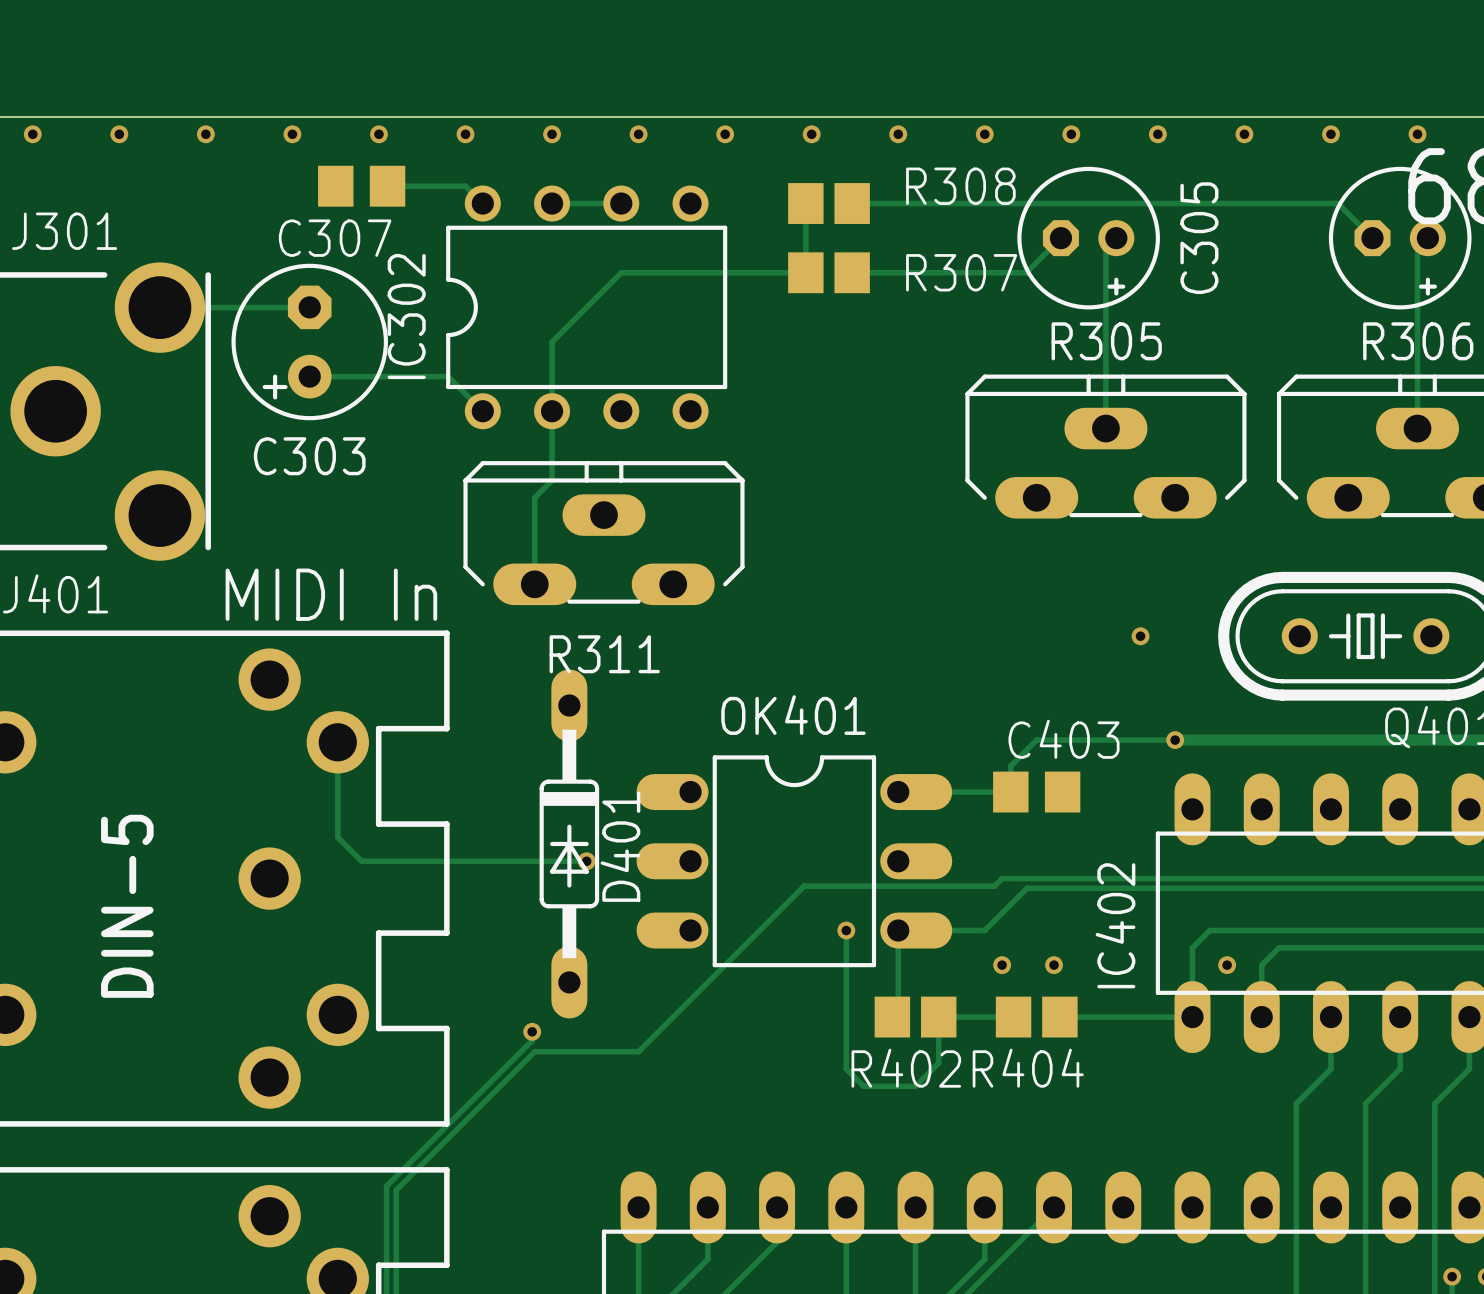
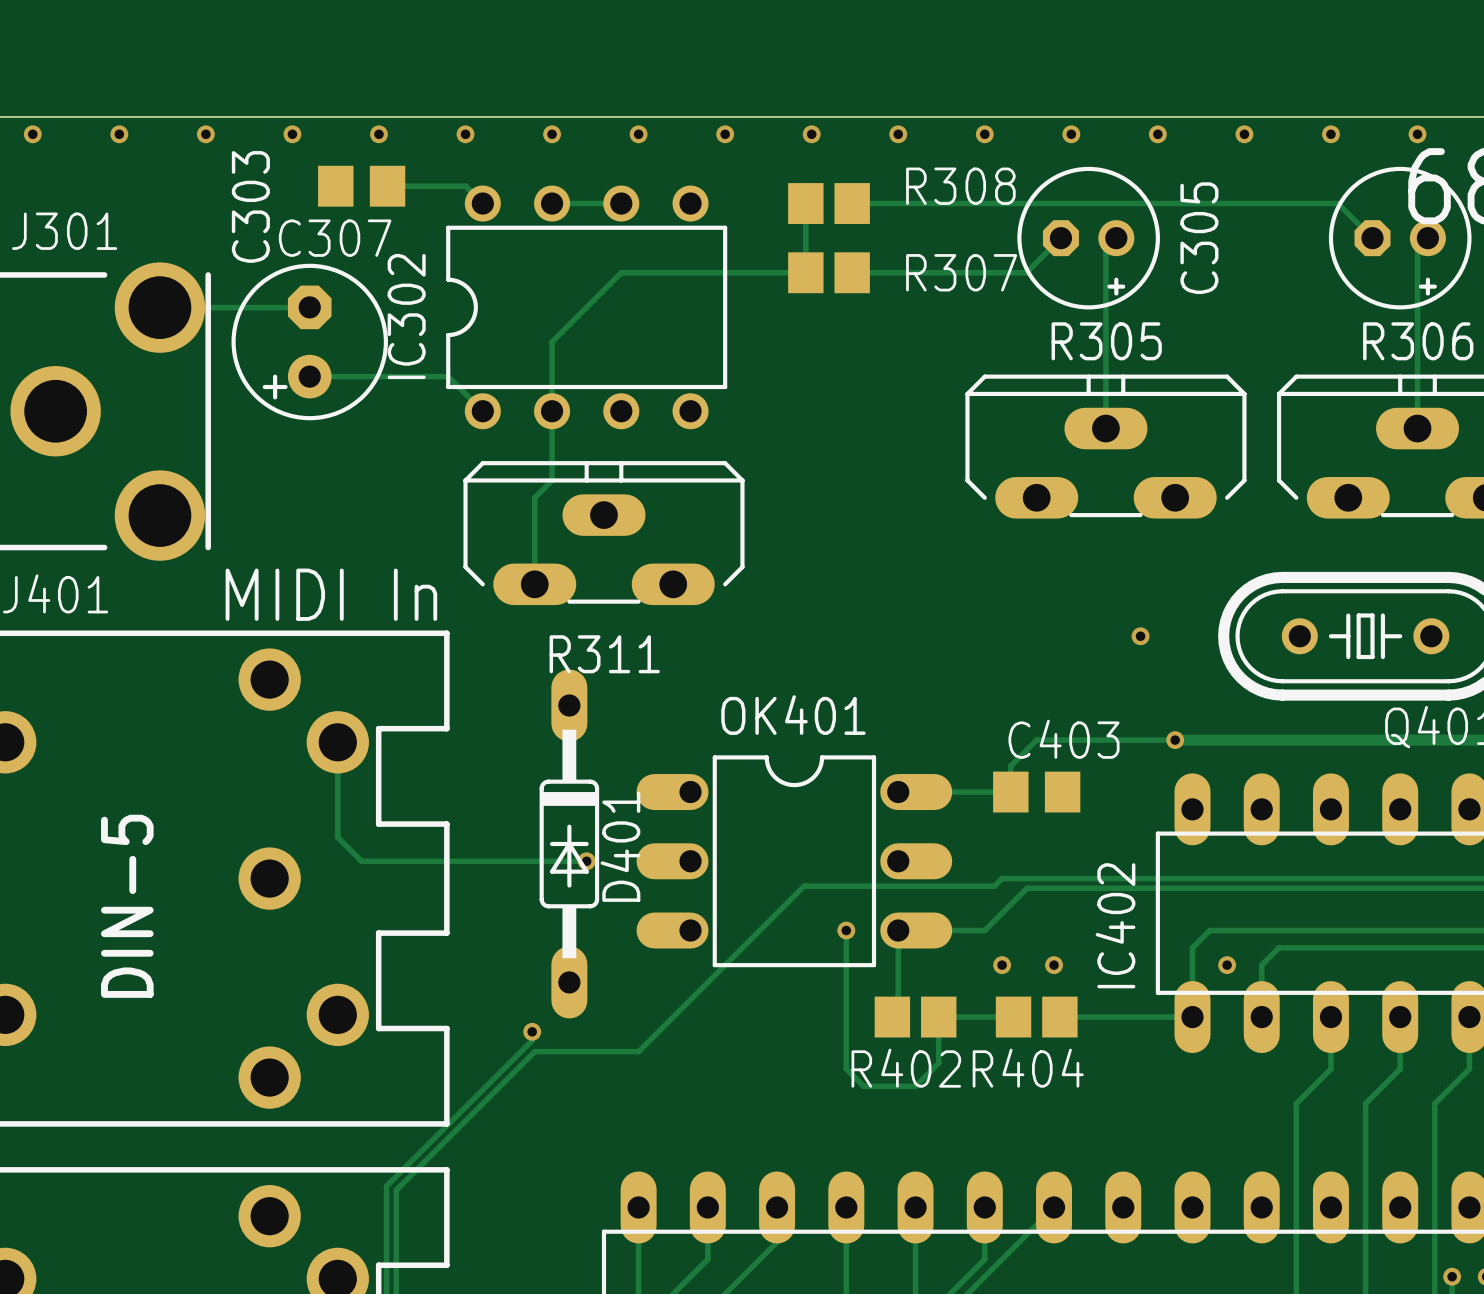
C303 name rotation: 0° (309, 456) -> 90° counterclockwise (250, 206)
C303 name position: C303 (309, 456) -> C303 (250, 206)

